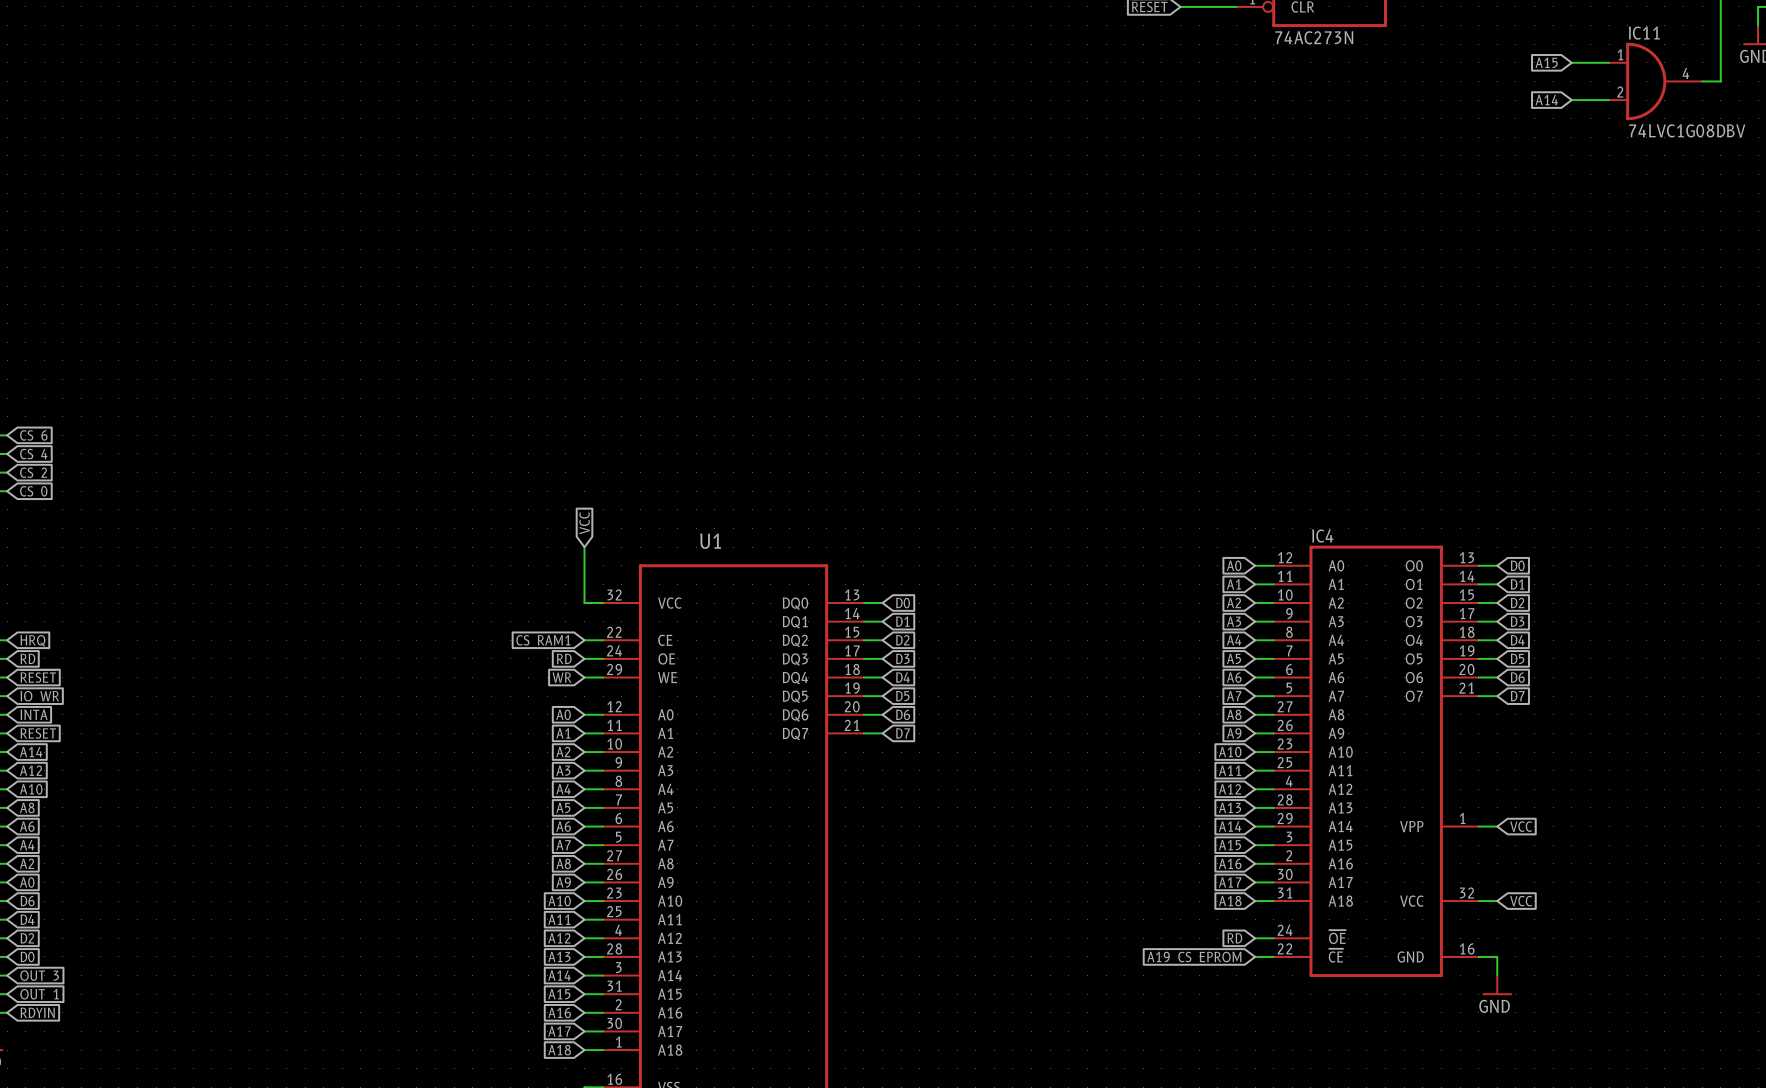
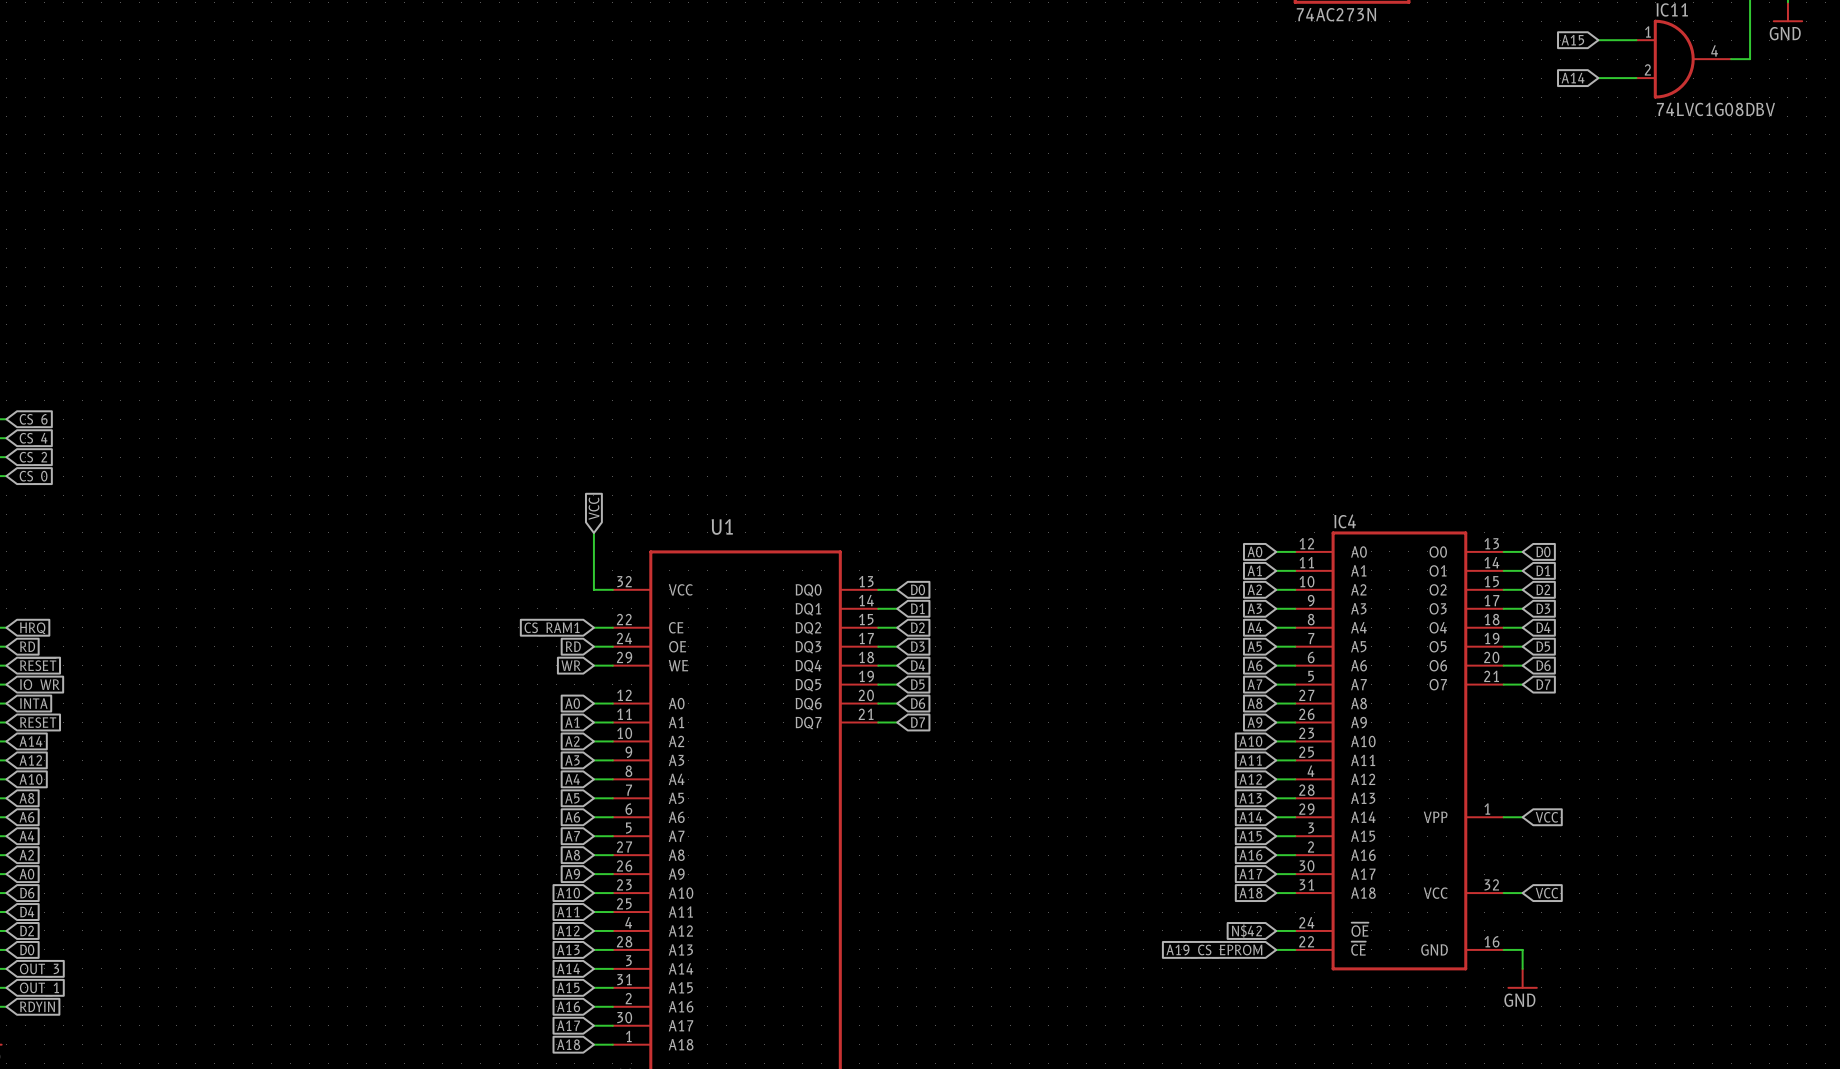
global label: RD (1234, 938) -> N$42 (1246, 930)

